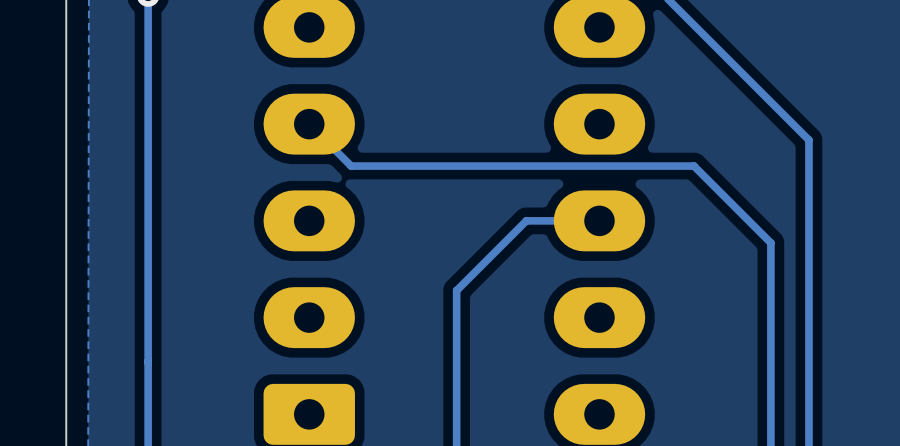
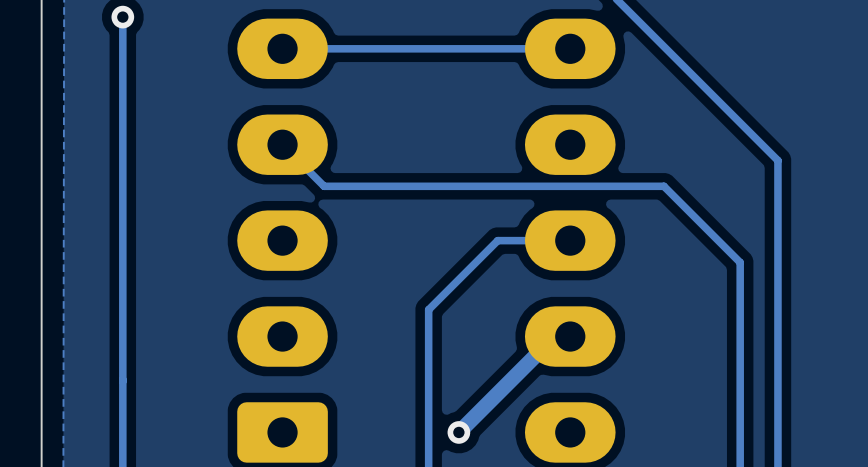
track: none -> (570, 48) (282, 48)
track: none -> (570, 336) (554, 336) (458, 432)
via: none -> (458, 432)

